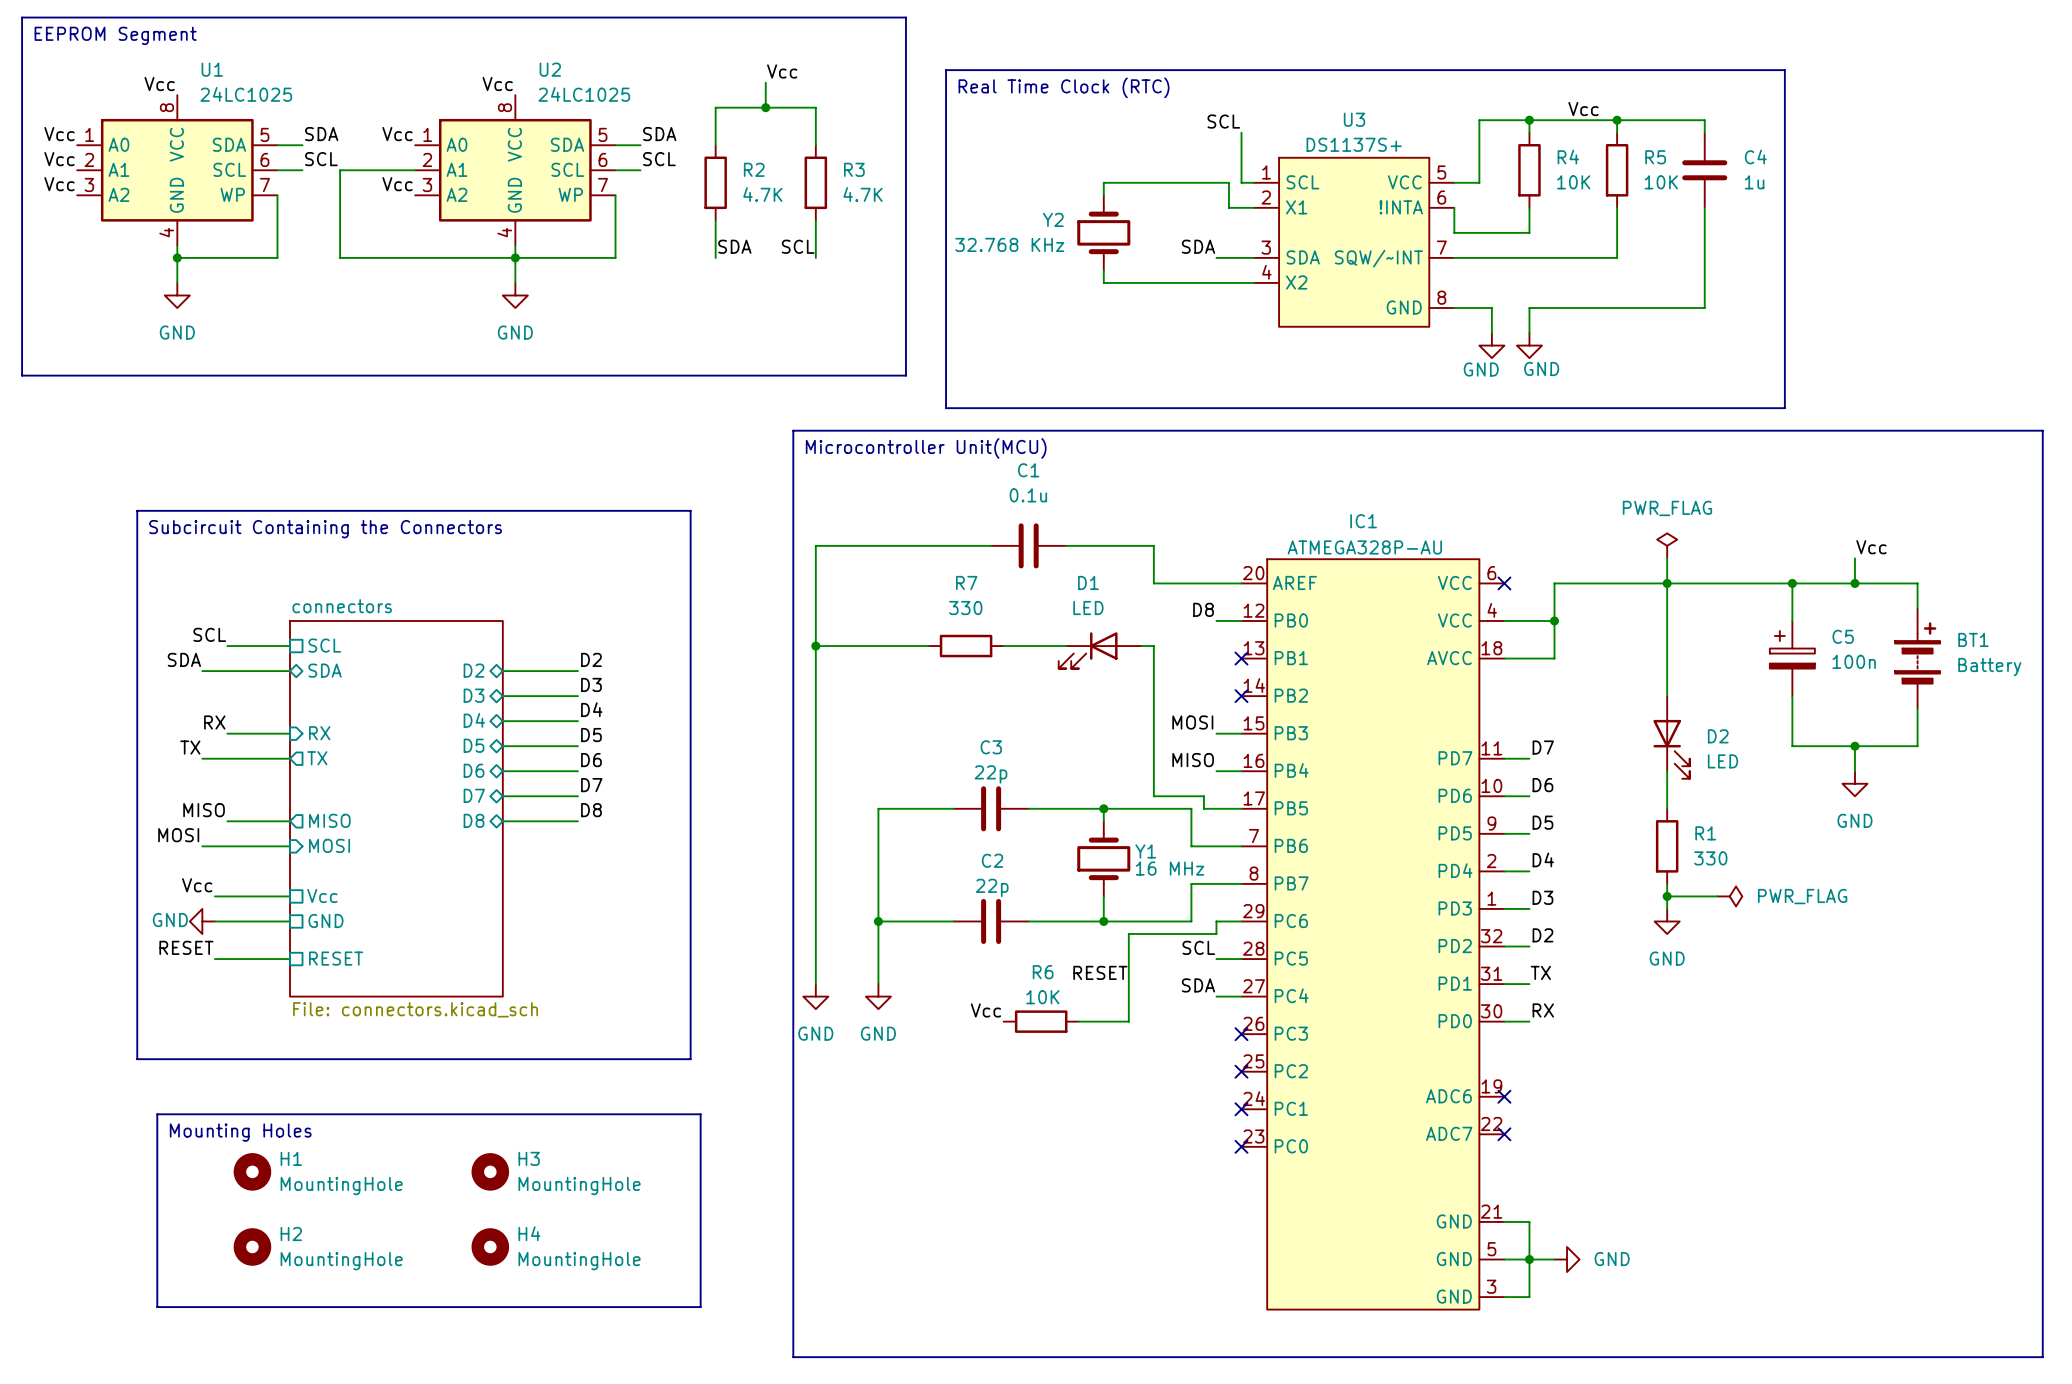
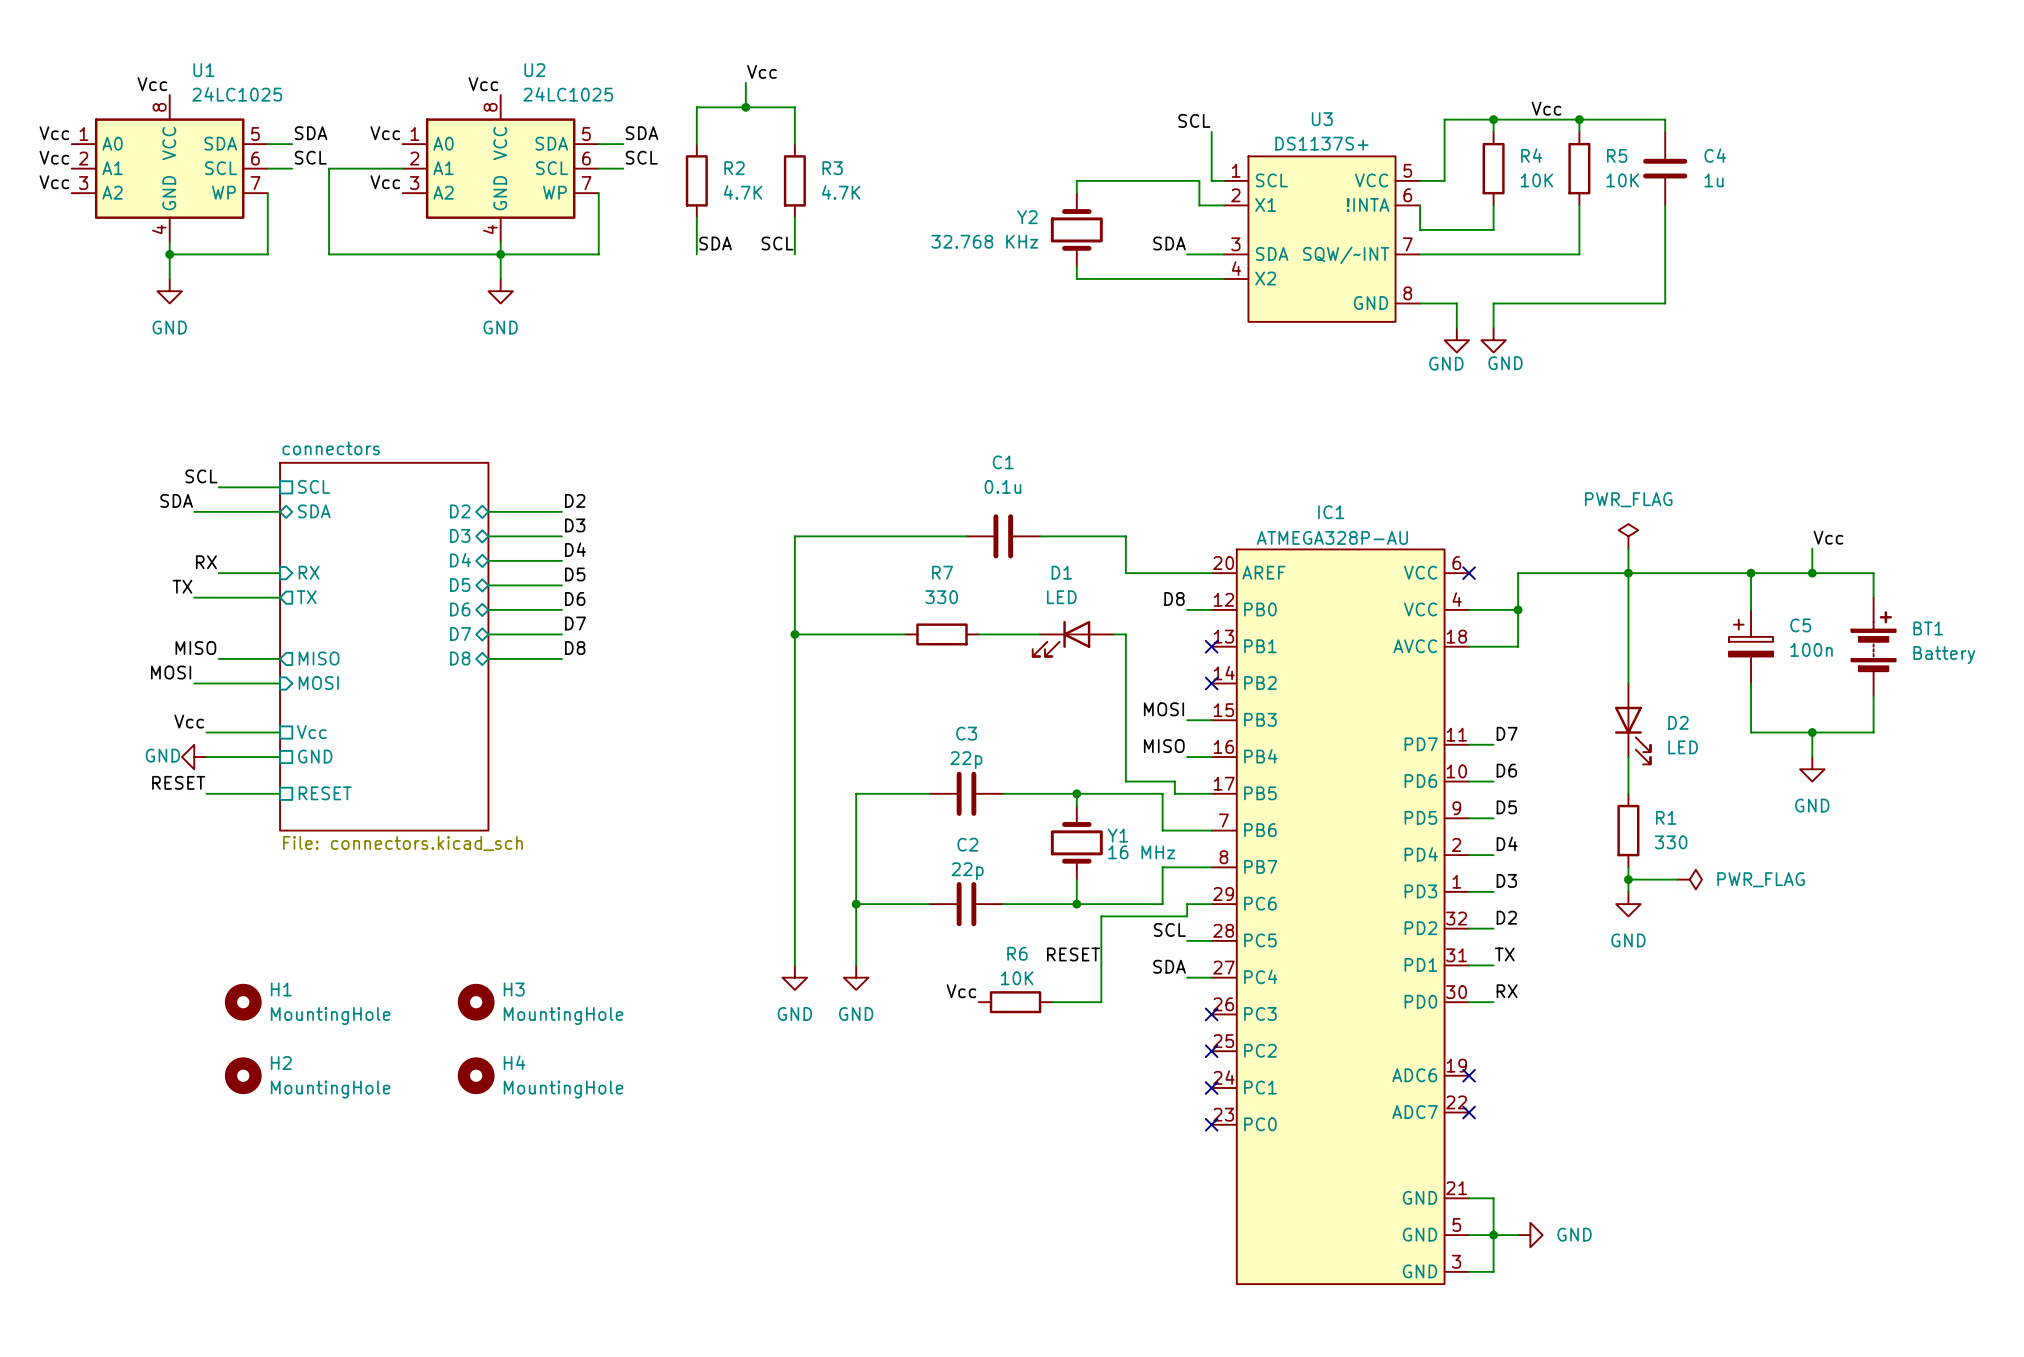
line: (22, 17) (905, 17) (905, 375) (22, 375) (22, 17) -> none
text: EEPROM Segment (115, 35) -> none
line: (946, 70) (1784, 70) (1784, 408) (946, 408) (946, 70) -> none
text: Real Time Clock (RTC) (1064, 87) -> none
line: (793, 430) (2042, 430) (2042, 1357) (793, 1357) (793, 430) -> none
text: Microcontroller Unit(MCU) (926, 448) -> none
label: none -> D2 (575, 500)
line: (137, 510) (690, 510) (690, 1059) (137, 1059) (137, 510) -> none
wire: none -> (194, 511) (280, 511)
sheet pin: none -> SDA (314, 511)
sheet pin: none -> D2 (460, 511)
wire: none -> (488, 511) (561, 511)
text: Subcircuit Containing the Connectors (325, 529) -> none
label position: SCL (209, 634) -> SCL (201, 476)
sheet pin position: SCL (324, 645) -> SCL (314, 486)
wire: (227, 646) (289, 646) -> (218, 487) (280, 487)
label position: SDA (184, 659) -> SDA (176, 500)
label: D2 (591, 659) -> D8 (575, 648)
sheet pin shape: bidirectional (325, 670) -> output (319, 658)
sheet pin: SDA (325, 670) -> MISO (319, 658)
sheet pin: D2 (474, 670) -> D8 (460, 658)
wire: (202, 671) (227, 671) -> none
label position: D3 (591, 684) -> D3 (575, 525)
sheet pin position: D3 (474, 695) -> D3 (460, 535)
wire: (502, 696) (577, 696) -> (488, 536) (561, 536)
label position: D4 (591, 709) -> D4 (575, 549)
sheet pin position: D4 (474, 720) -> D4 (460, 560)
wire: (502, 721) (577, 721) -> (488, 560) (561, 560)
label position: RX (214, 722) -> RX (206, 562)
wire: (227, 733) (289, 733) -> (218, 573) (280, 573)
sheet pin position: RX (319, 733) -> RX (309, 572)
label position: D5 (591, 735) -> D5 (575, 574)
sheet pin position: D5 (474, 745) -> D5 (460, 584)
wire: (502, 746) (577, 746) -> (488, 585) (561, 585)
label position: TX (190, 747) -> TX (182, 586)
wire: (202, 758) (289, 758) -> (194, 597) (280, 597)
sheet pin position: TX (317, 758) -> TX (306, 597)
label position: D6 (591, 760) -> D6 (575, 598)
sheet pin position: D6 (474, 770) -> D6 (460, 609)
wire: (502, 771) (577, 771) -> (488, 609) (561, 609)
label position: D7 (591, 785) -> D7 (575, 623)
sheet pin position: D7 (474, 795) -> D7 (460, 633)
wire: (502, 796) (577, 796) -> (488, 634) (561, 634)
sheet connectors position: (396, 808) -> (384, 646)
label position: MISO (204, 810) -> MISO (195, 648)
label: D8 (591, 810) -> none
sheet pin: MISO (329, 820) -> none
sheet pin: D8 (474, 820) -> none
wire: (227, 821) (289, 821) -> none
wire: (502, 821) (577, 821) -> none
label position: MOSI (178, 835) -> MOSI (171, 672)
sheet pin position: MOSI (329, 845) -> MOSI (318, 683)
wire: (202, 846) (289, 846) -> (194, 683) (280, 683)
label position: Vcc (197, 885) -> Vcc (189, 721)
sheet pin position: Vcc (322, 895) -> Vcc (311, 732)
wire: (214, 896) (289, 896) -> (206, 732) (280, 732)
power symbol position: GND (202, 921) -> GND (194, 757)
wire: (214, 921) (289, 921) -> (206, 757) (280, 757)
sheet pin position: GND (325, 921) -> GND (315, 756)
label position: RESET (186, 947) -> RESET (178, 782)
sheet pin position: RESET (336, 958) -> RESET (325, 793)
wire: (214, 959) (289, 959) -> (206, 793) (280, 793)
line: (157, 1114) (700, 1114) (700, 1307) (157, 1307) (157, 1114) -> none
text: Mounting Holes (240, 1132) -> none
H1 position: (252, 1171) -> (243, 1002)
H3 position: (490, 1171) -> (476, 1002)
H2 position: (252, 1246) -> (243, 1075)
H4 position: (490, 1246) -> (476, 1075)

